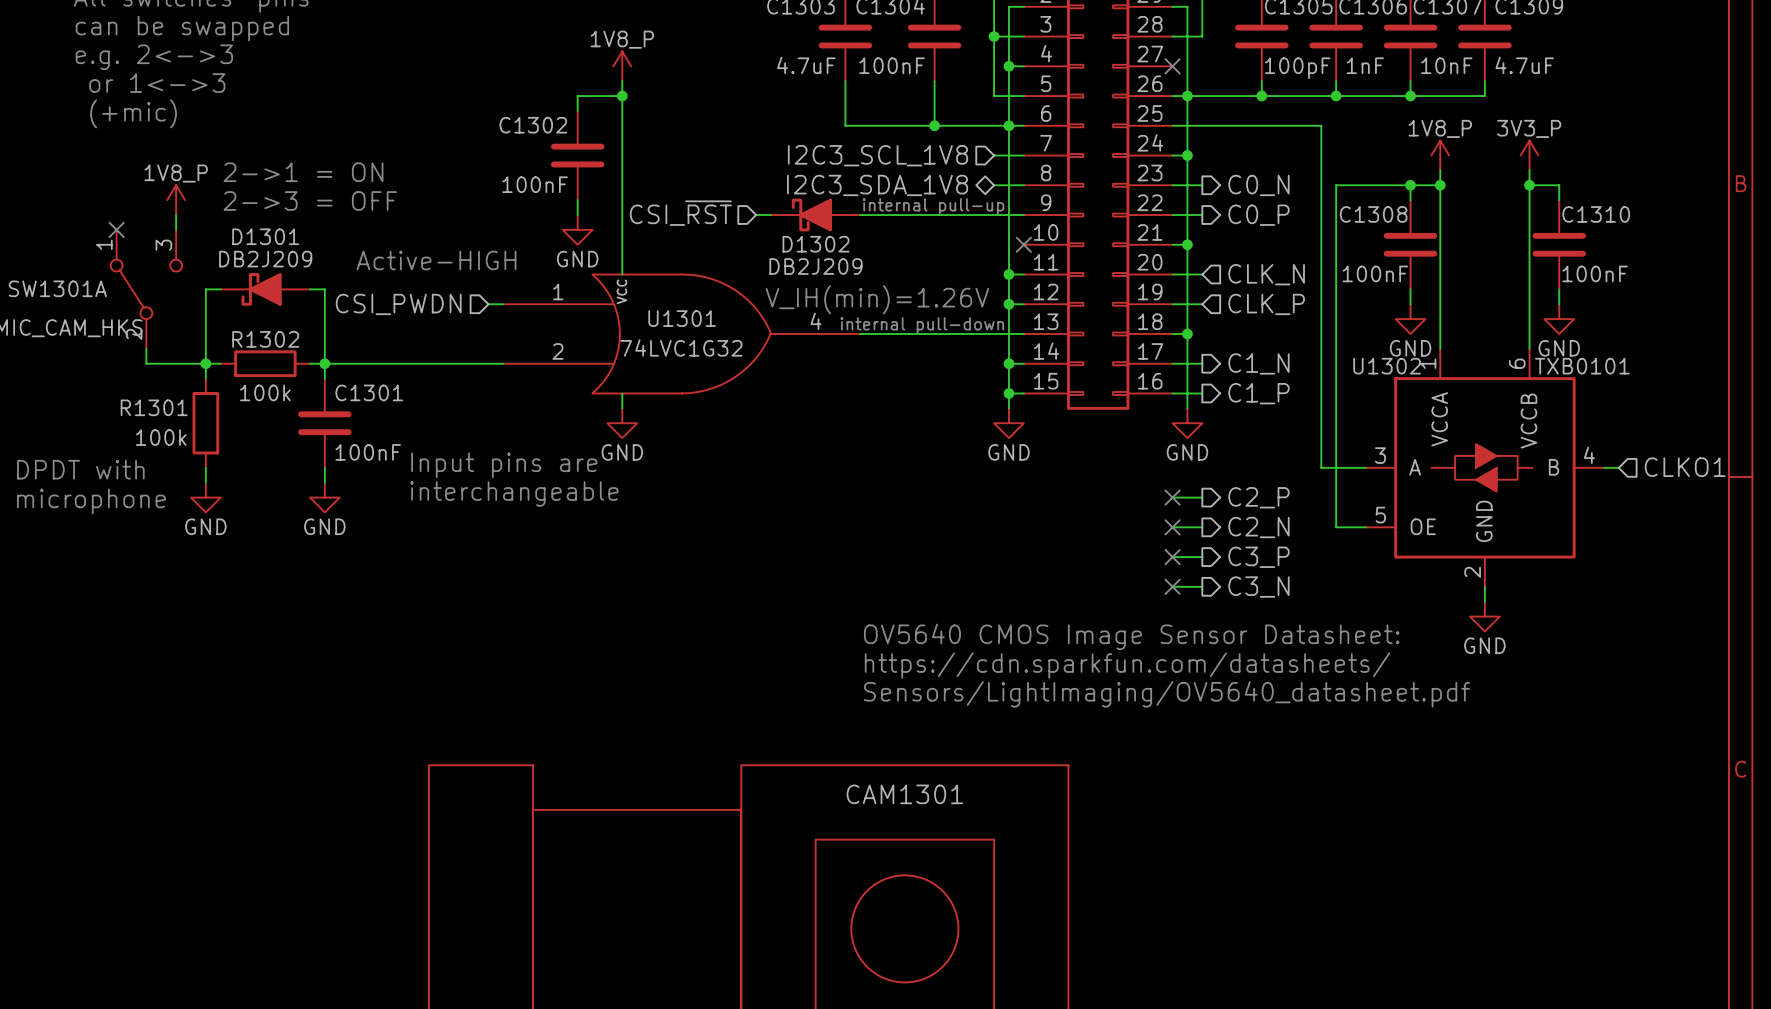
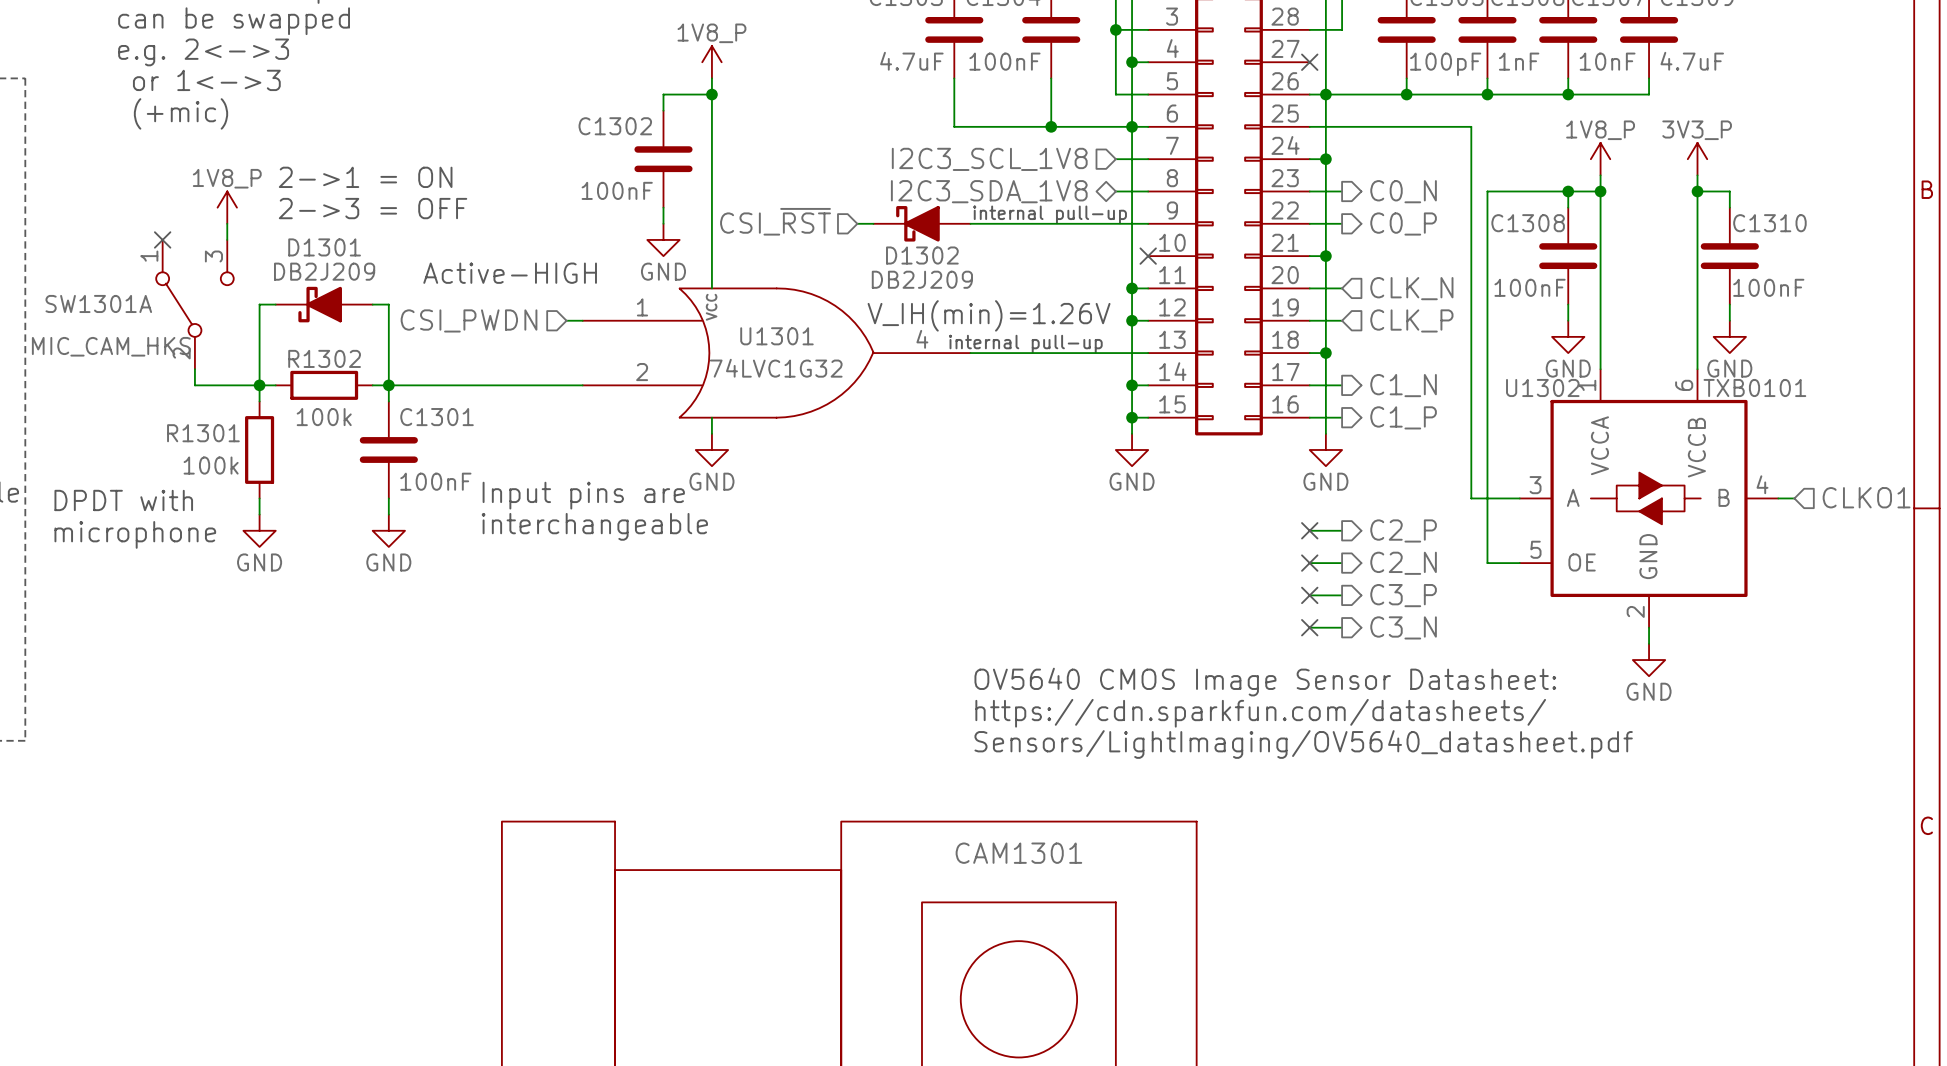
text: internal pull-down (922, 325) -> internal pull-up (1025, 344)

